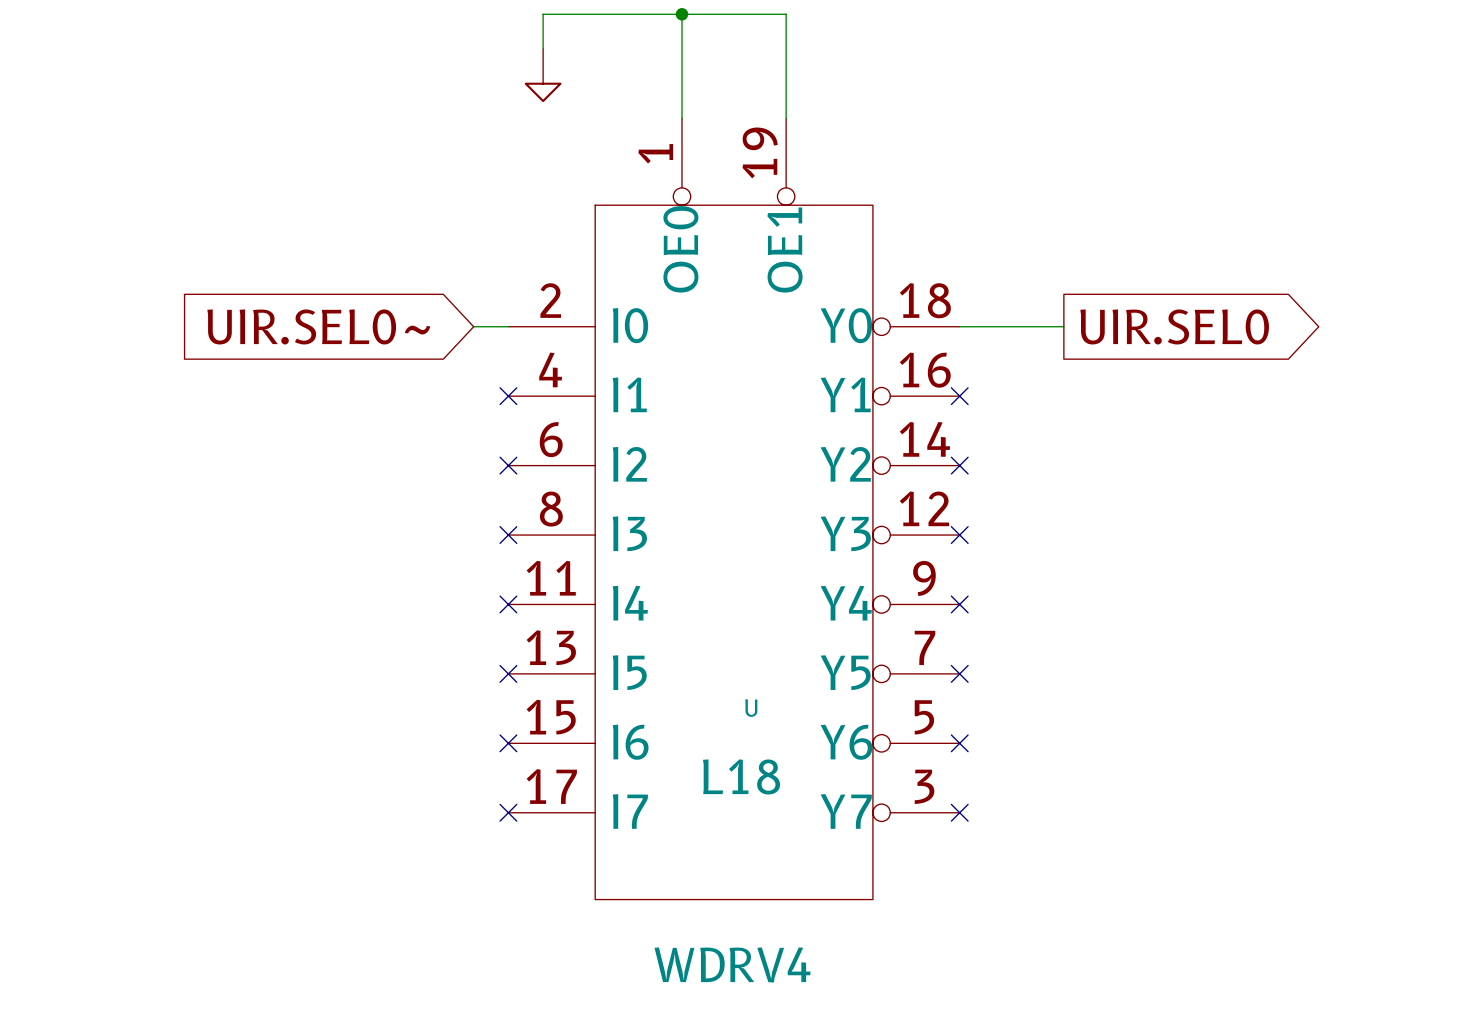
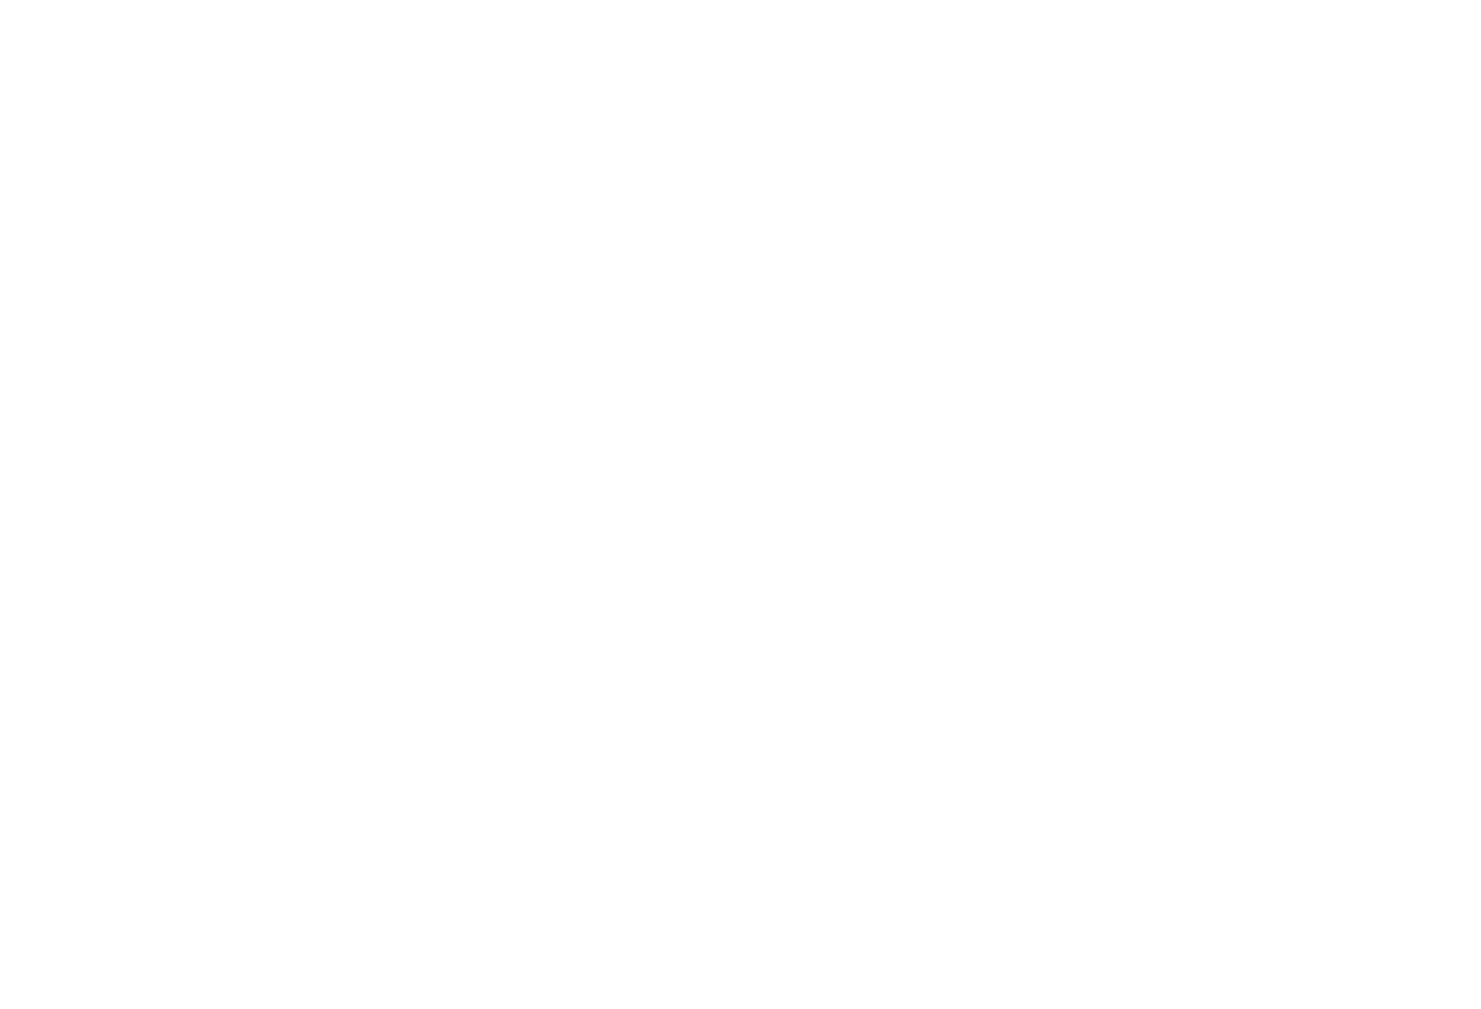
wire: (681, 14) (681, 118) -> none
junction: (681, 14) -> none
wire: (543, 49) (543, 14) (786, 14) (786, 118) -> none
power symbol: (543, 75) -> none
global label: UIR.SEL0~ (318, 326) -> none
wire: (473, 326) (508, 326) -> none
wire: (959, 326) (1063, 326) -> none
global label: UIR.SEL0 (1174, 326) -> none
no-connect mark: (508, 396) -> none
no-connect mark: (959, 396) -> none
no-connect mark: (508, 465) -> none
no-connect mark: (959, 465) -> none
U: (734, 508) -> none
no-connect mark: (508, 535) -> none
no-connect mark: (959, 535) -> none
no-connect mark: (508, 604) -> none
no-connect mark: (959, 604) -> none
no-connect mark: (508, 673) -> none
no-connect mark: (959, 673) -> none
no-connect mark: (508, 743) -> none
no-connect mark: (959, 743) -> none
no-connect mark: (508, 812) -> none
no-connect mark: (959, 812) -> none

